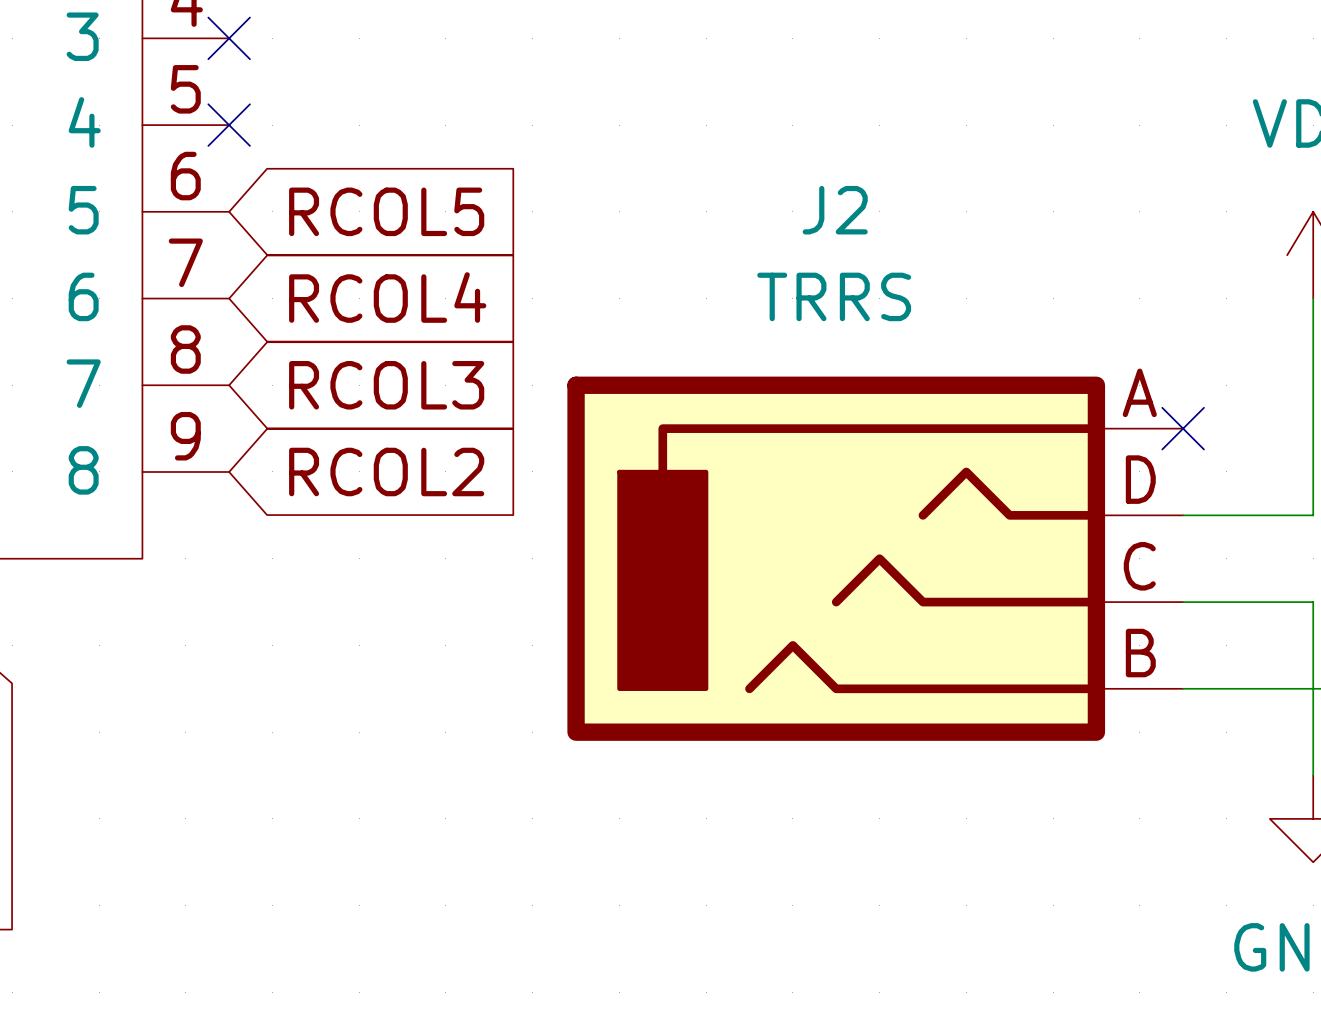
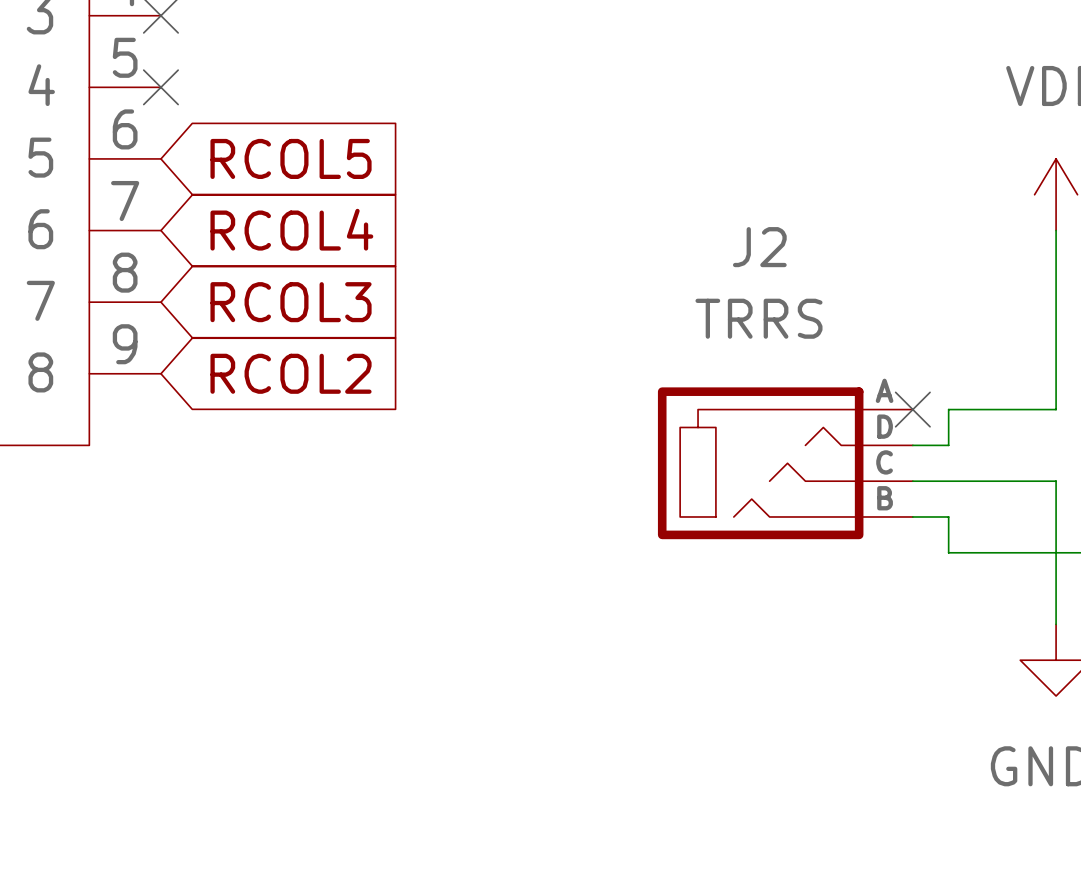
J2 name position: J2 (835, 210) -> J2 (759, 247)
J2 value position: TRRS (834, 296) -> TRRS (758, 318)
J2 symbol: [567, 376, 1184, 741] -> [657, 387, 913, 540]
no-connect mark position: (1183, 428) -> (912, 409)
wire: none -> (948, 409) (948, 445) (912, 445)
wire: none -> (912, 516) (948, 516) (948, 552)

